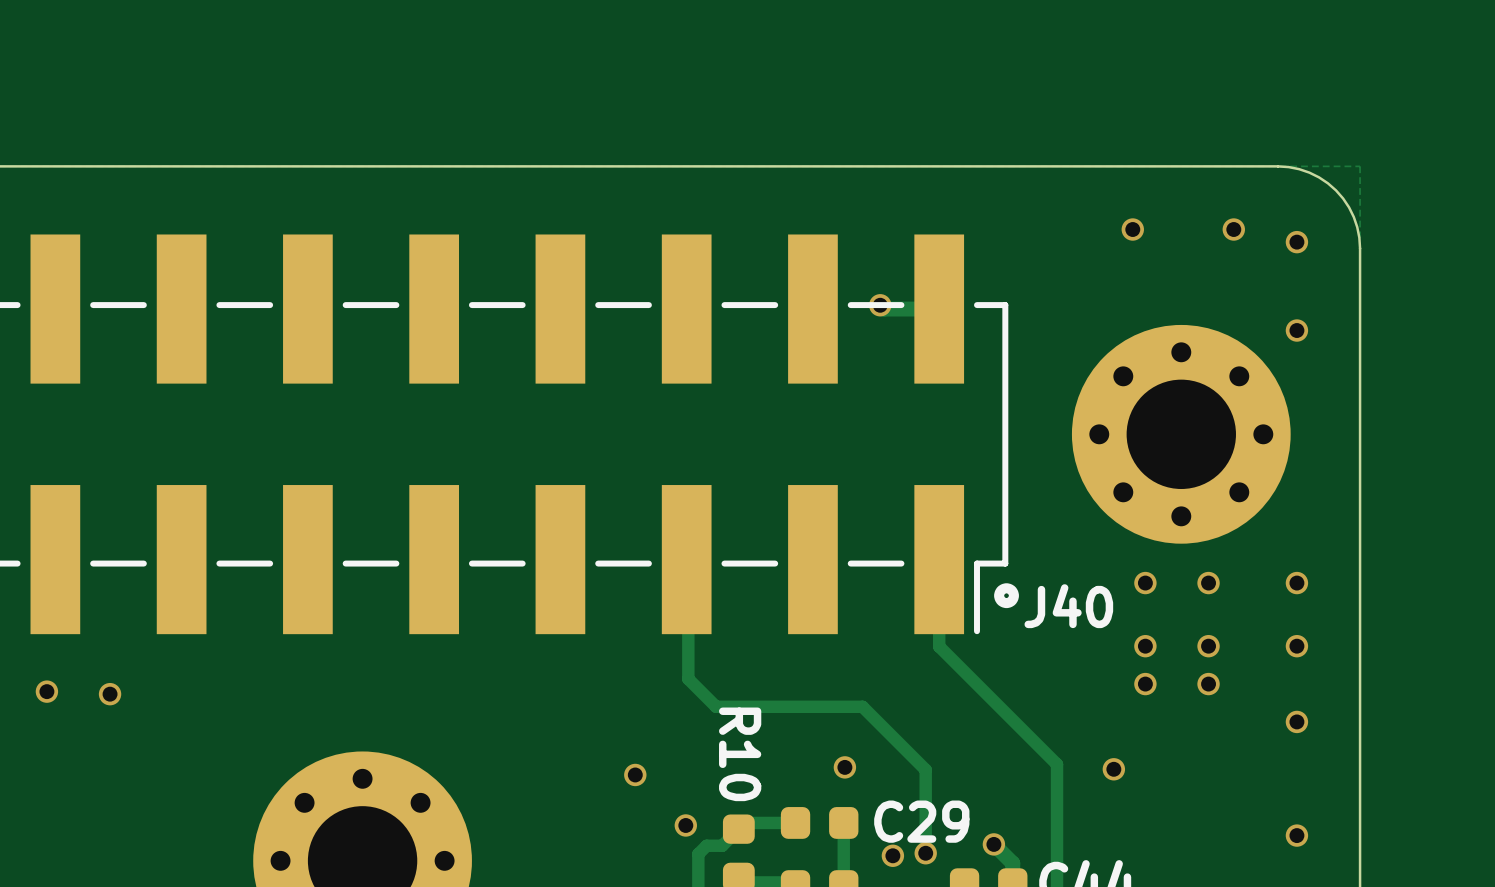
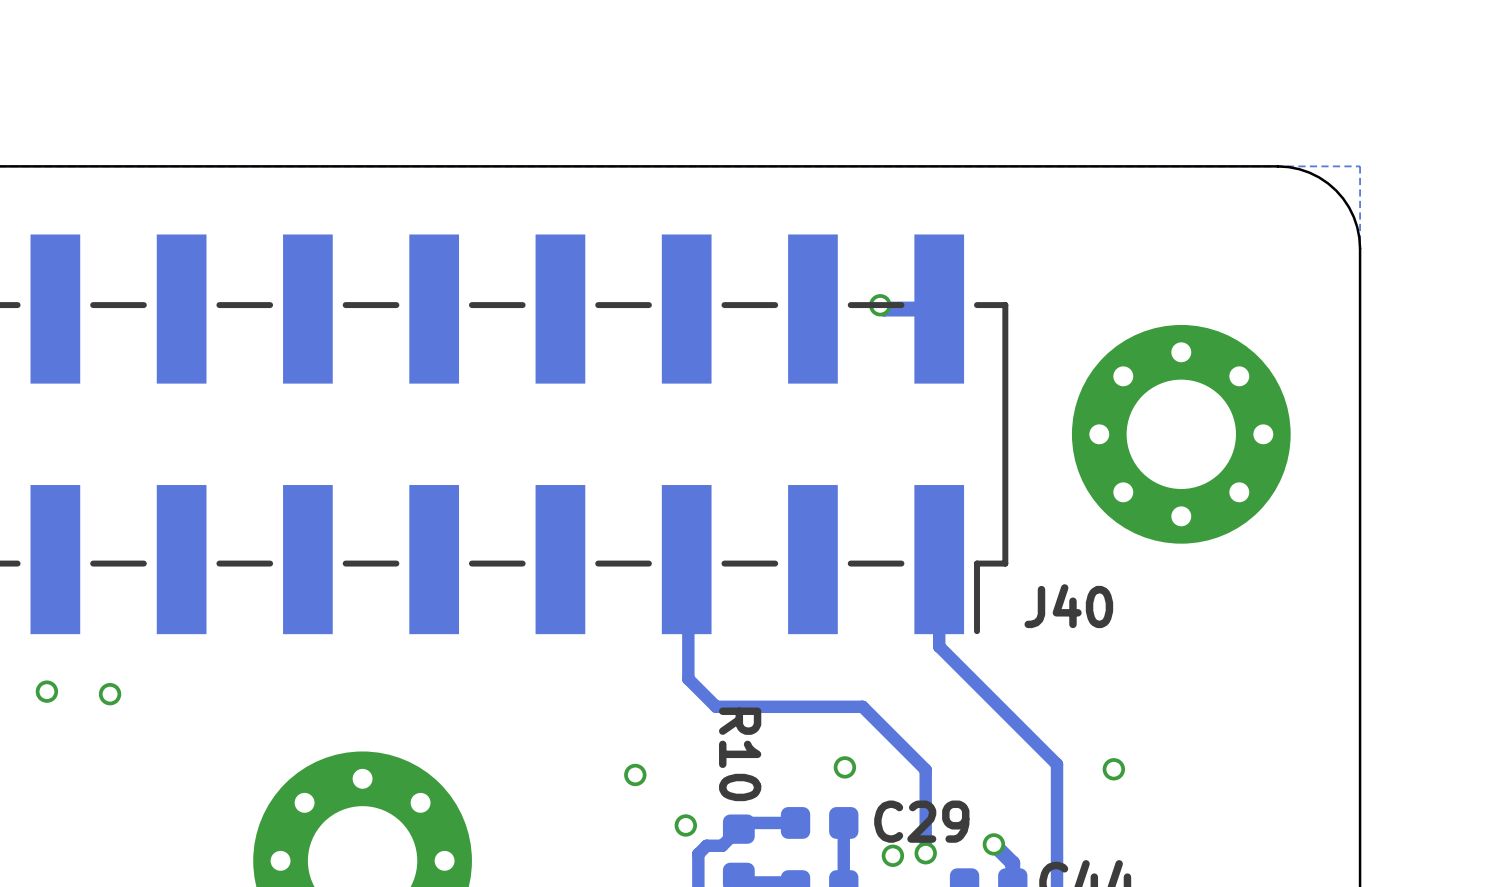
via: (1132, 229) -> none
via: (1233, 229) -> none
via: (1296, 242) -> none
via: (1296, 330) -> none
drawing: [994, 583, 1019, 609] -> none
via: (1145, 583) -> none
via: (1208, 583) -> none
via: (1296, 583) -> none
via: (1145, 646) -> none
via: (1208, 646) -> none
via: (1296, 646) -> none
via: (1145, 684) -> none
via: (1208, 684) -> none
via: (1296, 721) -> none
via: (1296, 835) -> none

